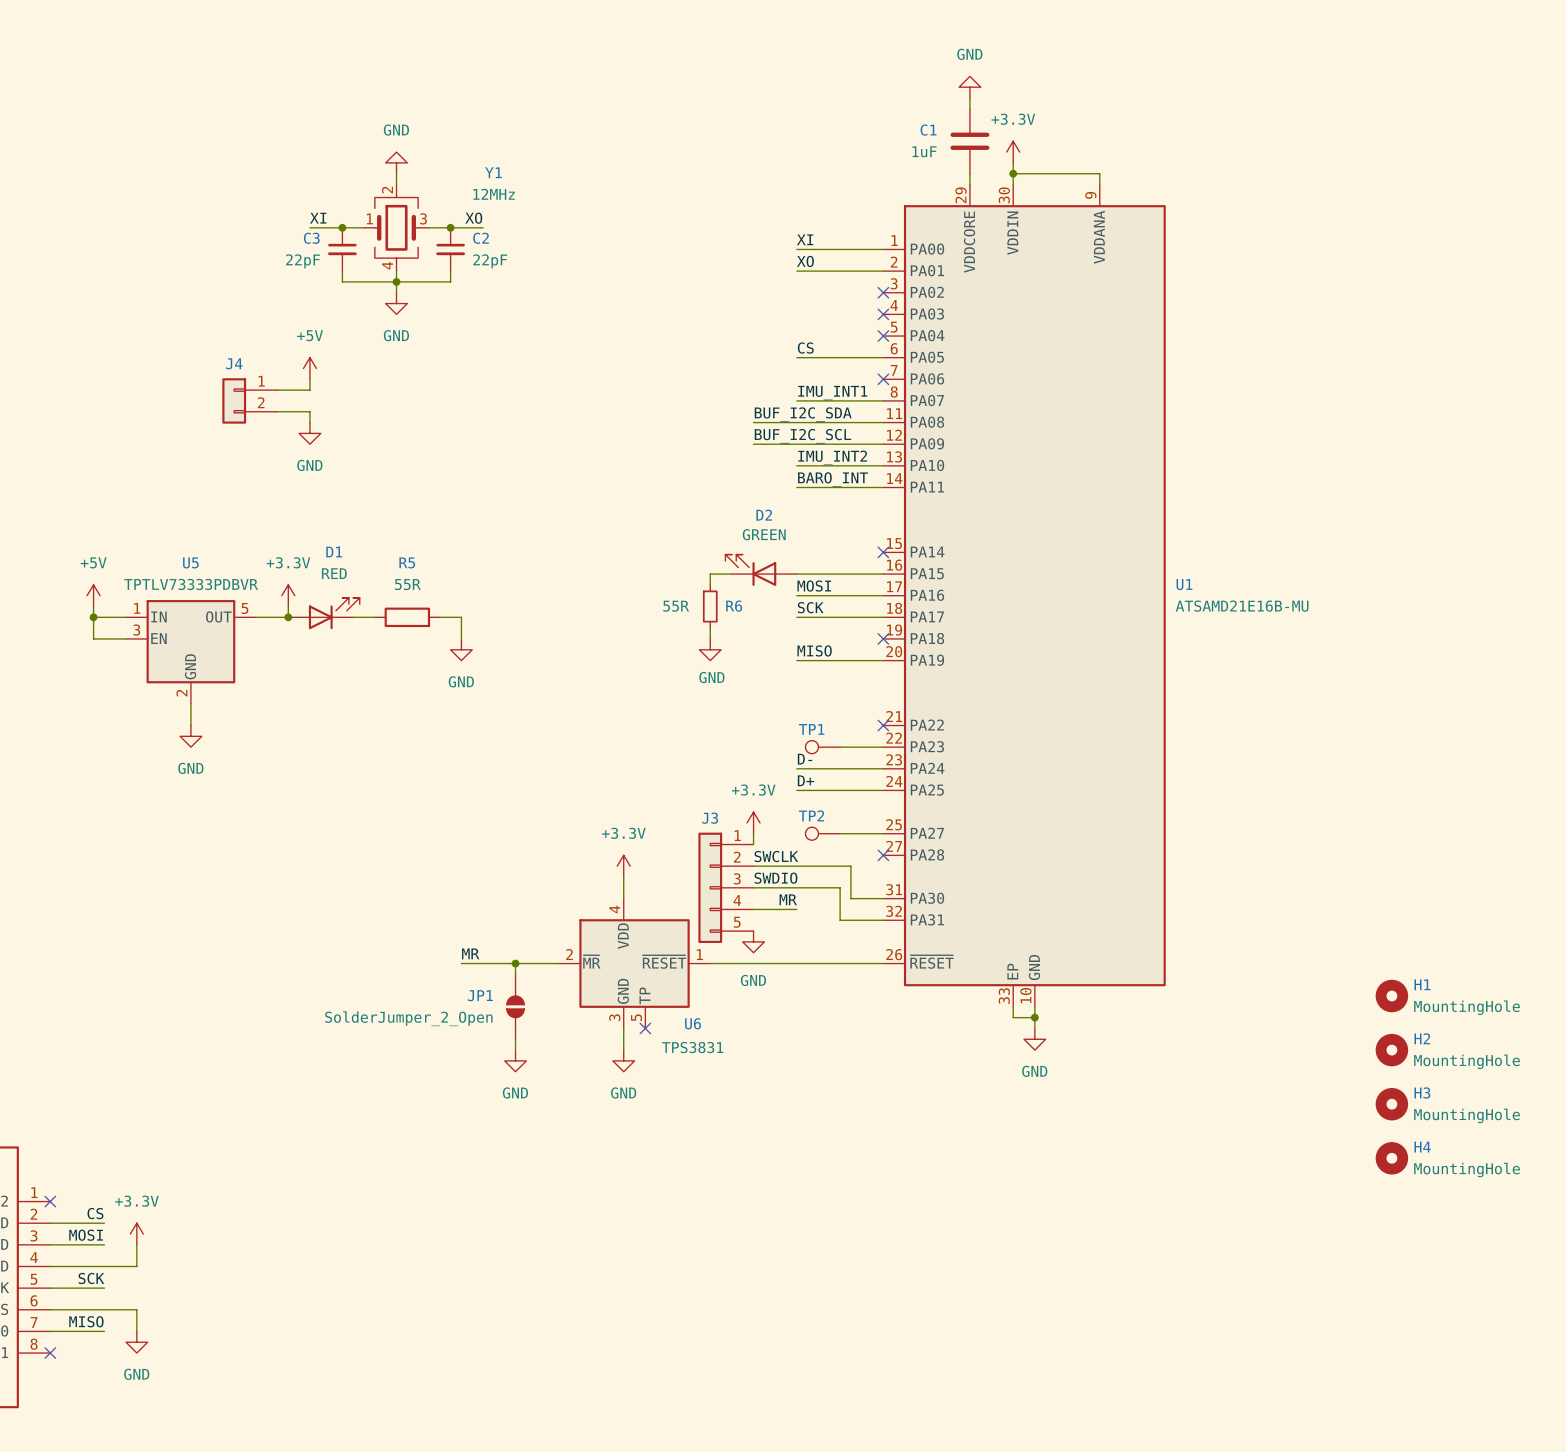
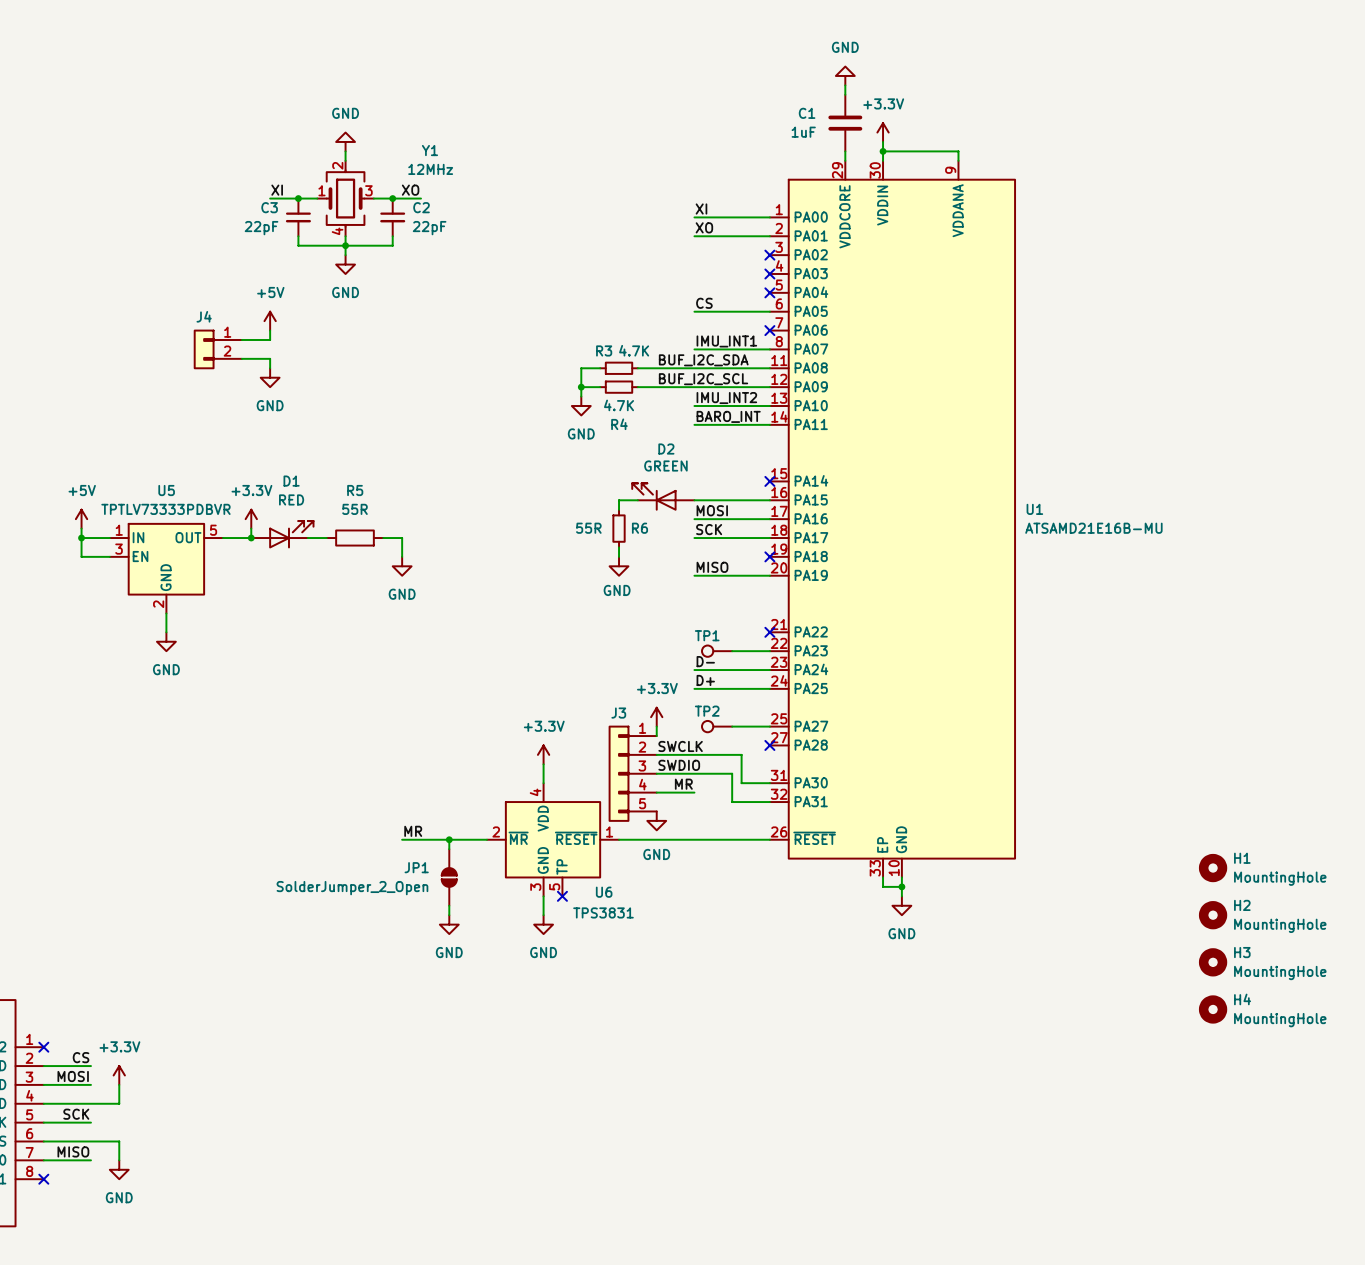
wire: none -> (600, 368) (581, 368) (581, 396)
R3: none -> 4.7K (619, 368)
wire: none -> (637, 368) (656, 368)
wire: none -> (581, 387) (600, 387)
junction: none -> (581, 387)
R4: none -> 4.7K (619, 387)
wire: none -> (637, 387) (656, 387)
power symbol: none -> GND (581, 406)

